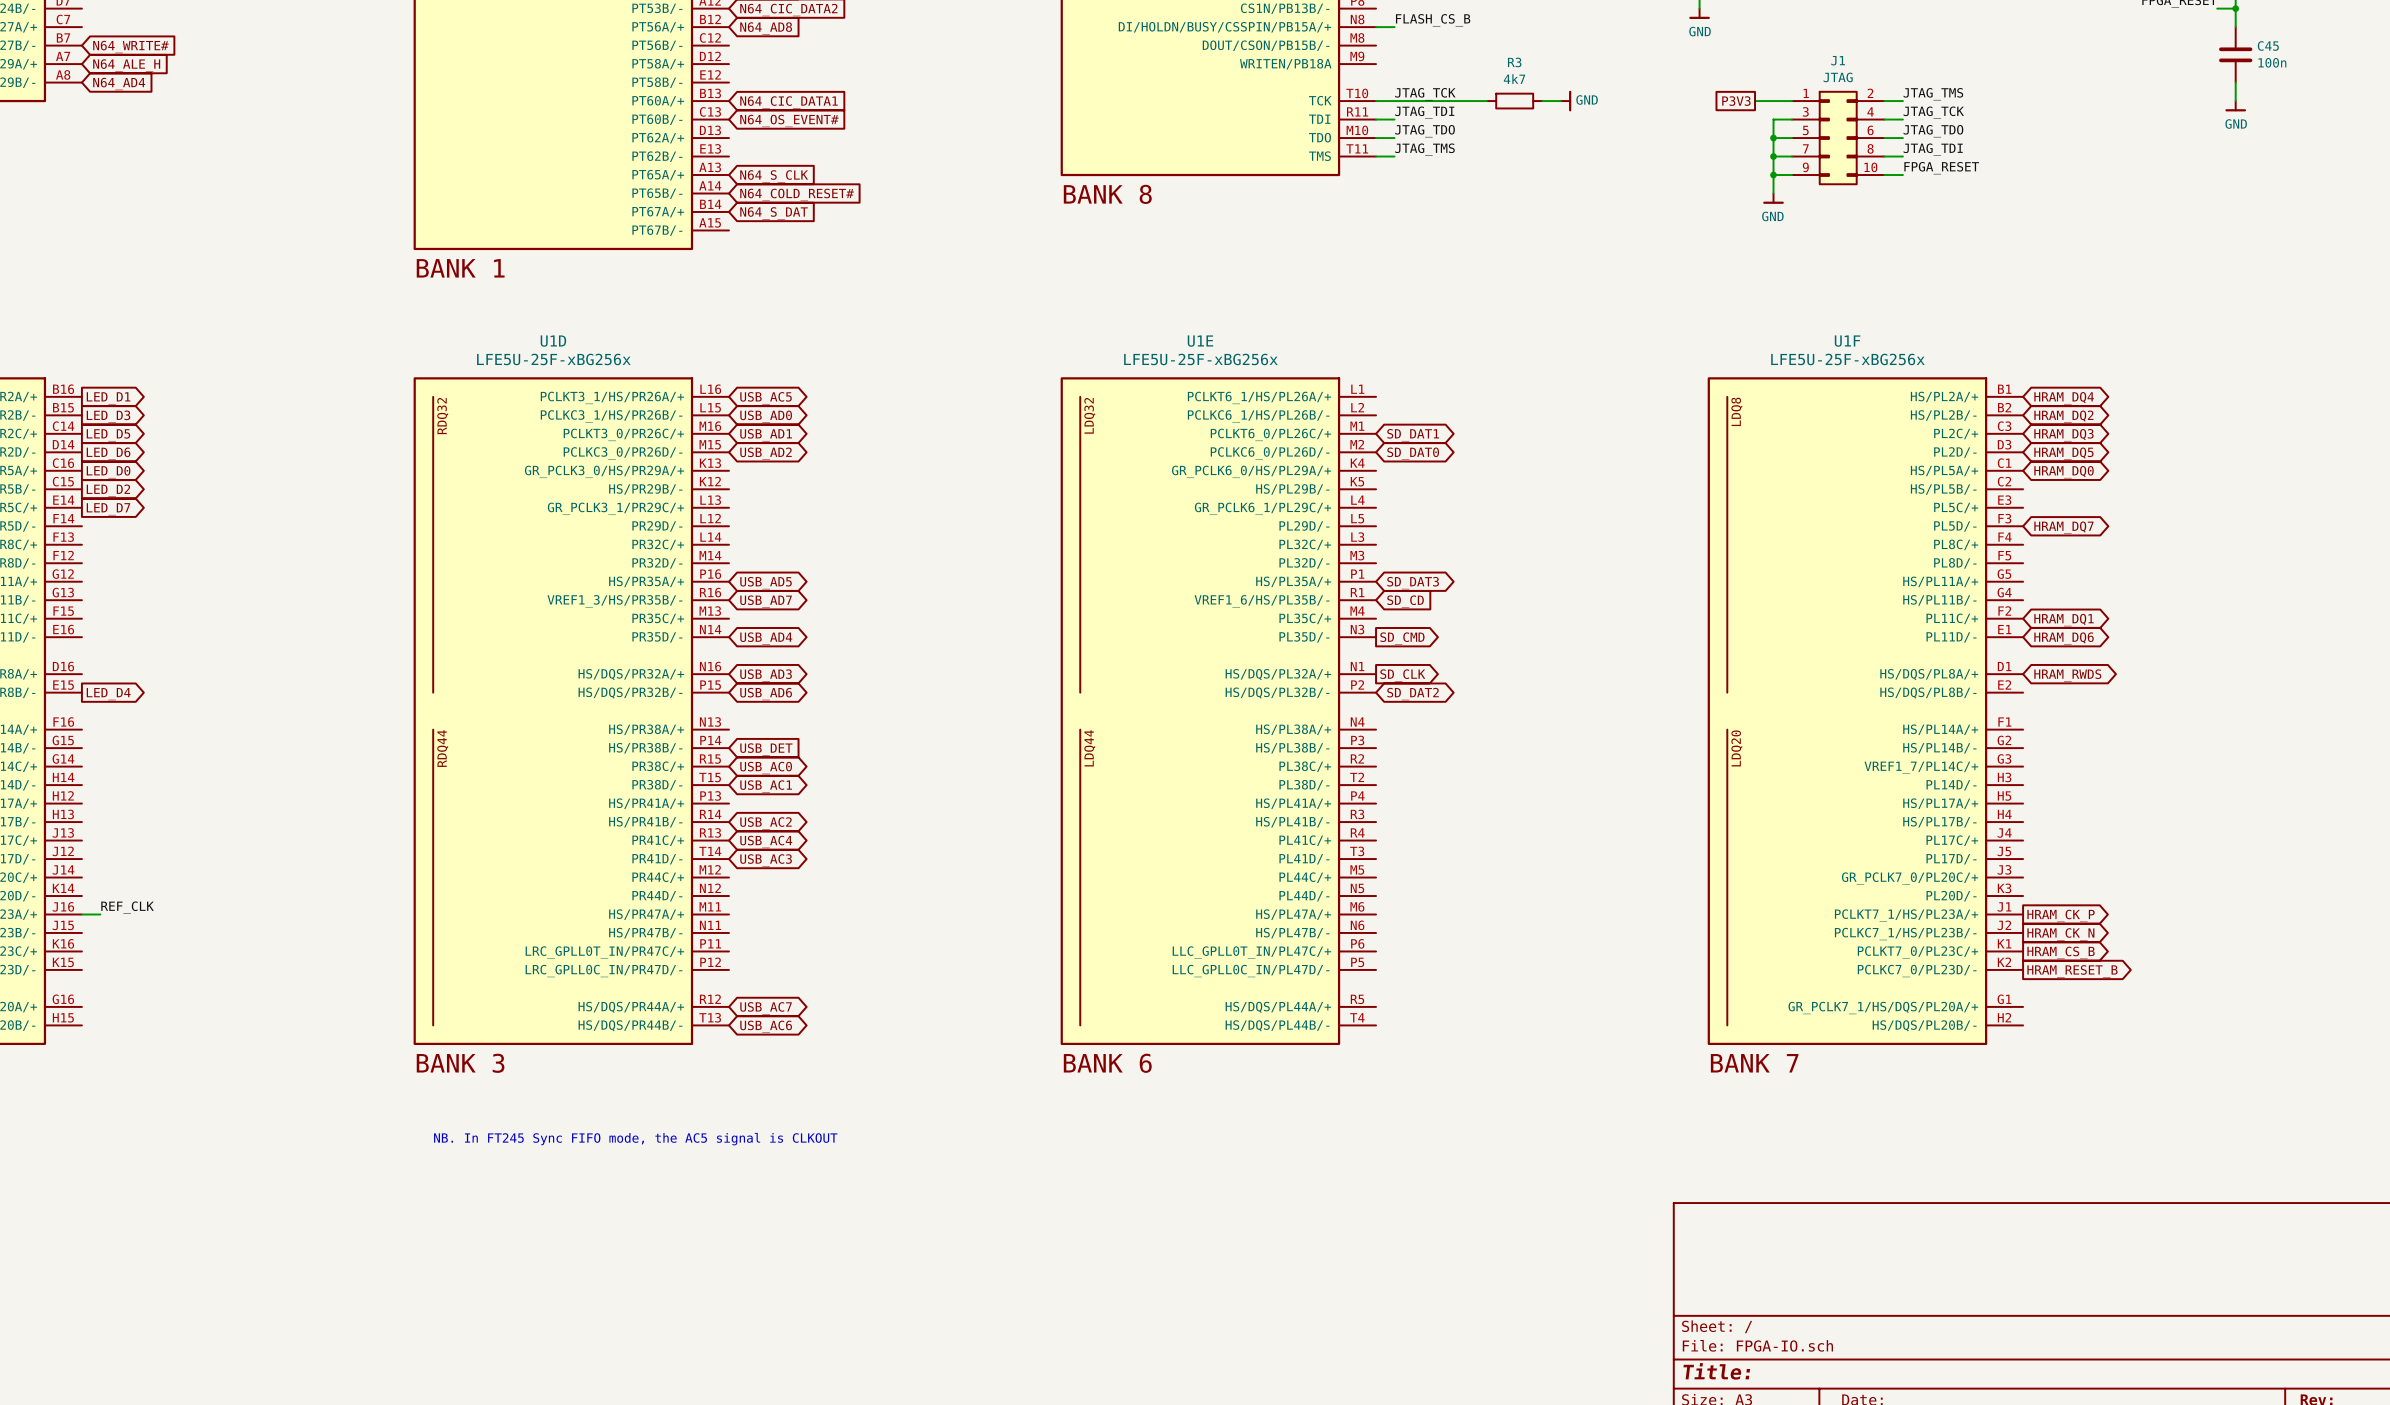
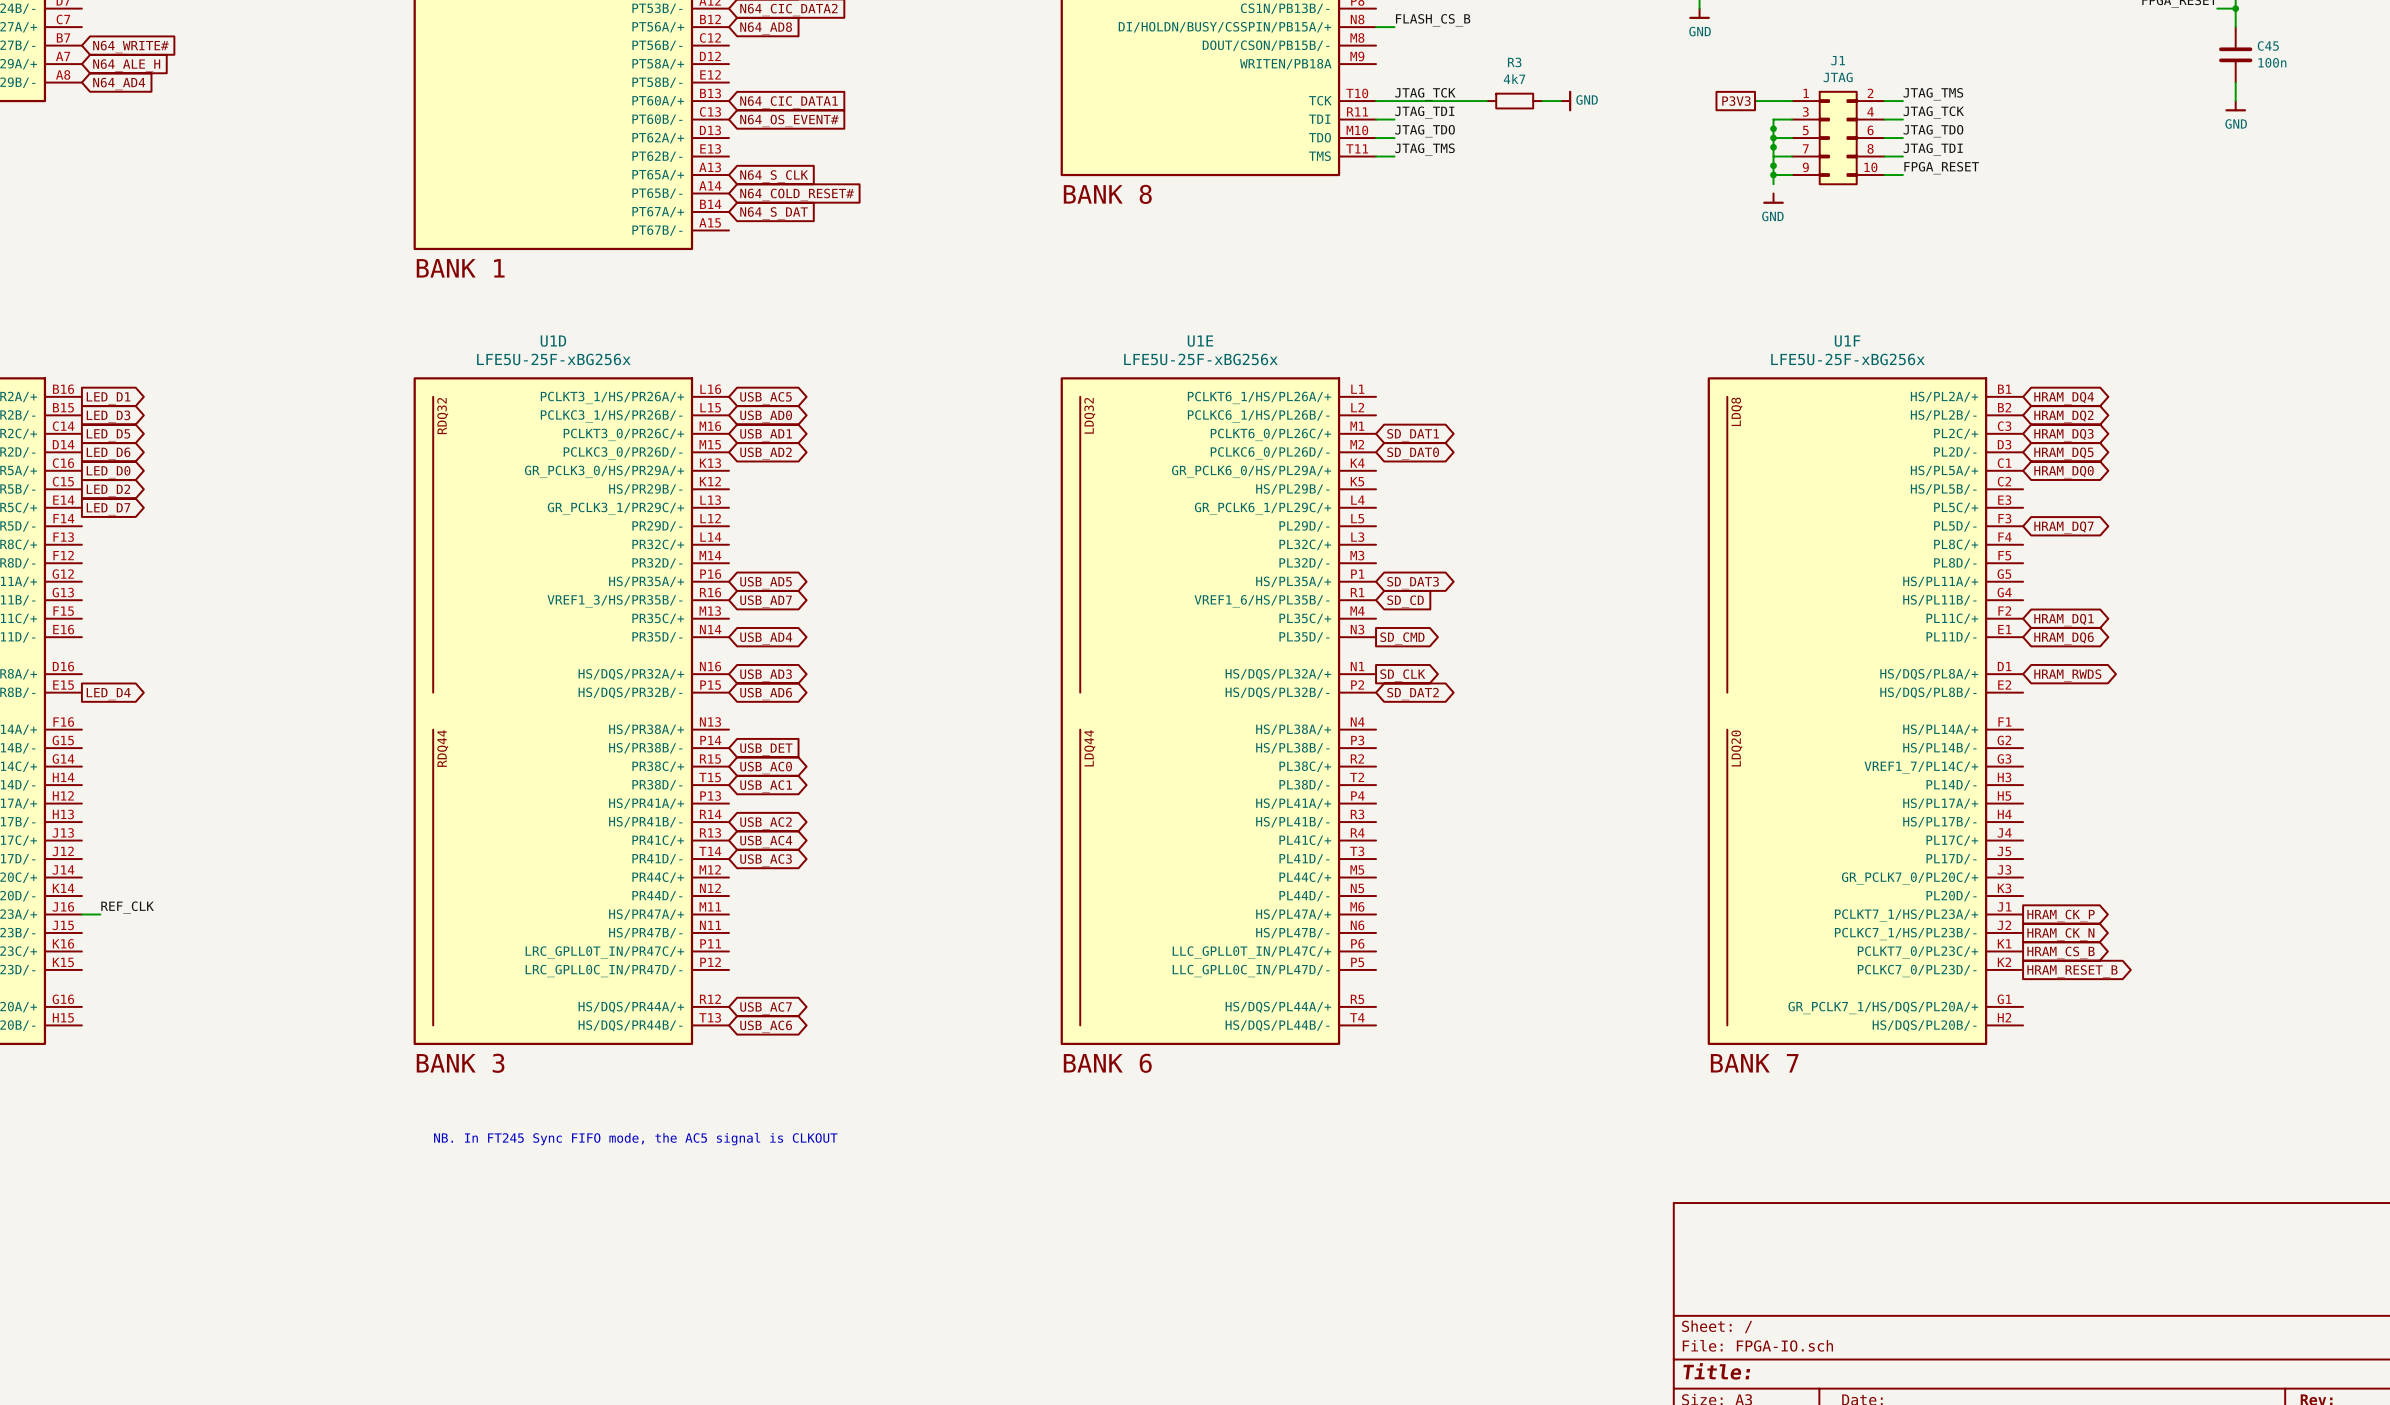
junction: none -> (1773, 128)
junction: none -> (1773, 147)
junction: (1773, 156) -> none
junction: none -> (1773, 165)
wire: (1773, 184) (1773, 193) -> none

